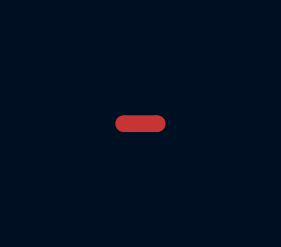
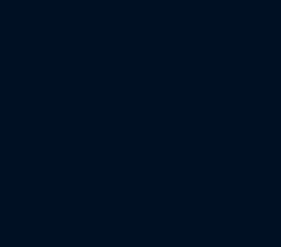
part: (140, 123) -> none

